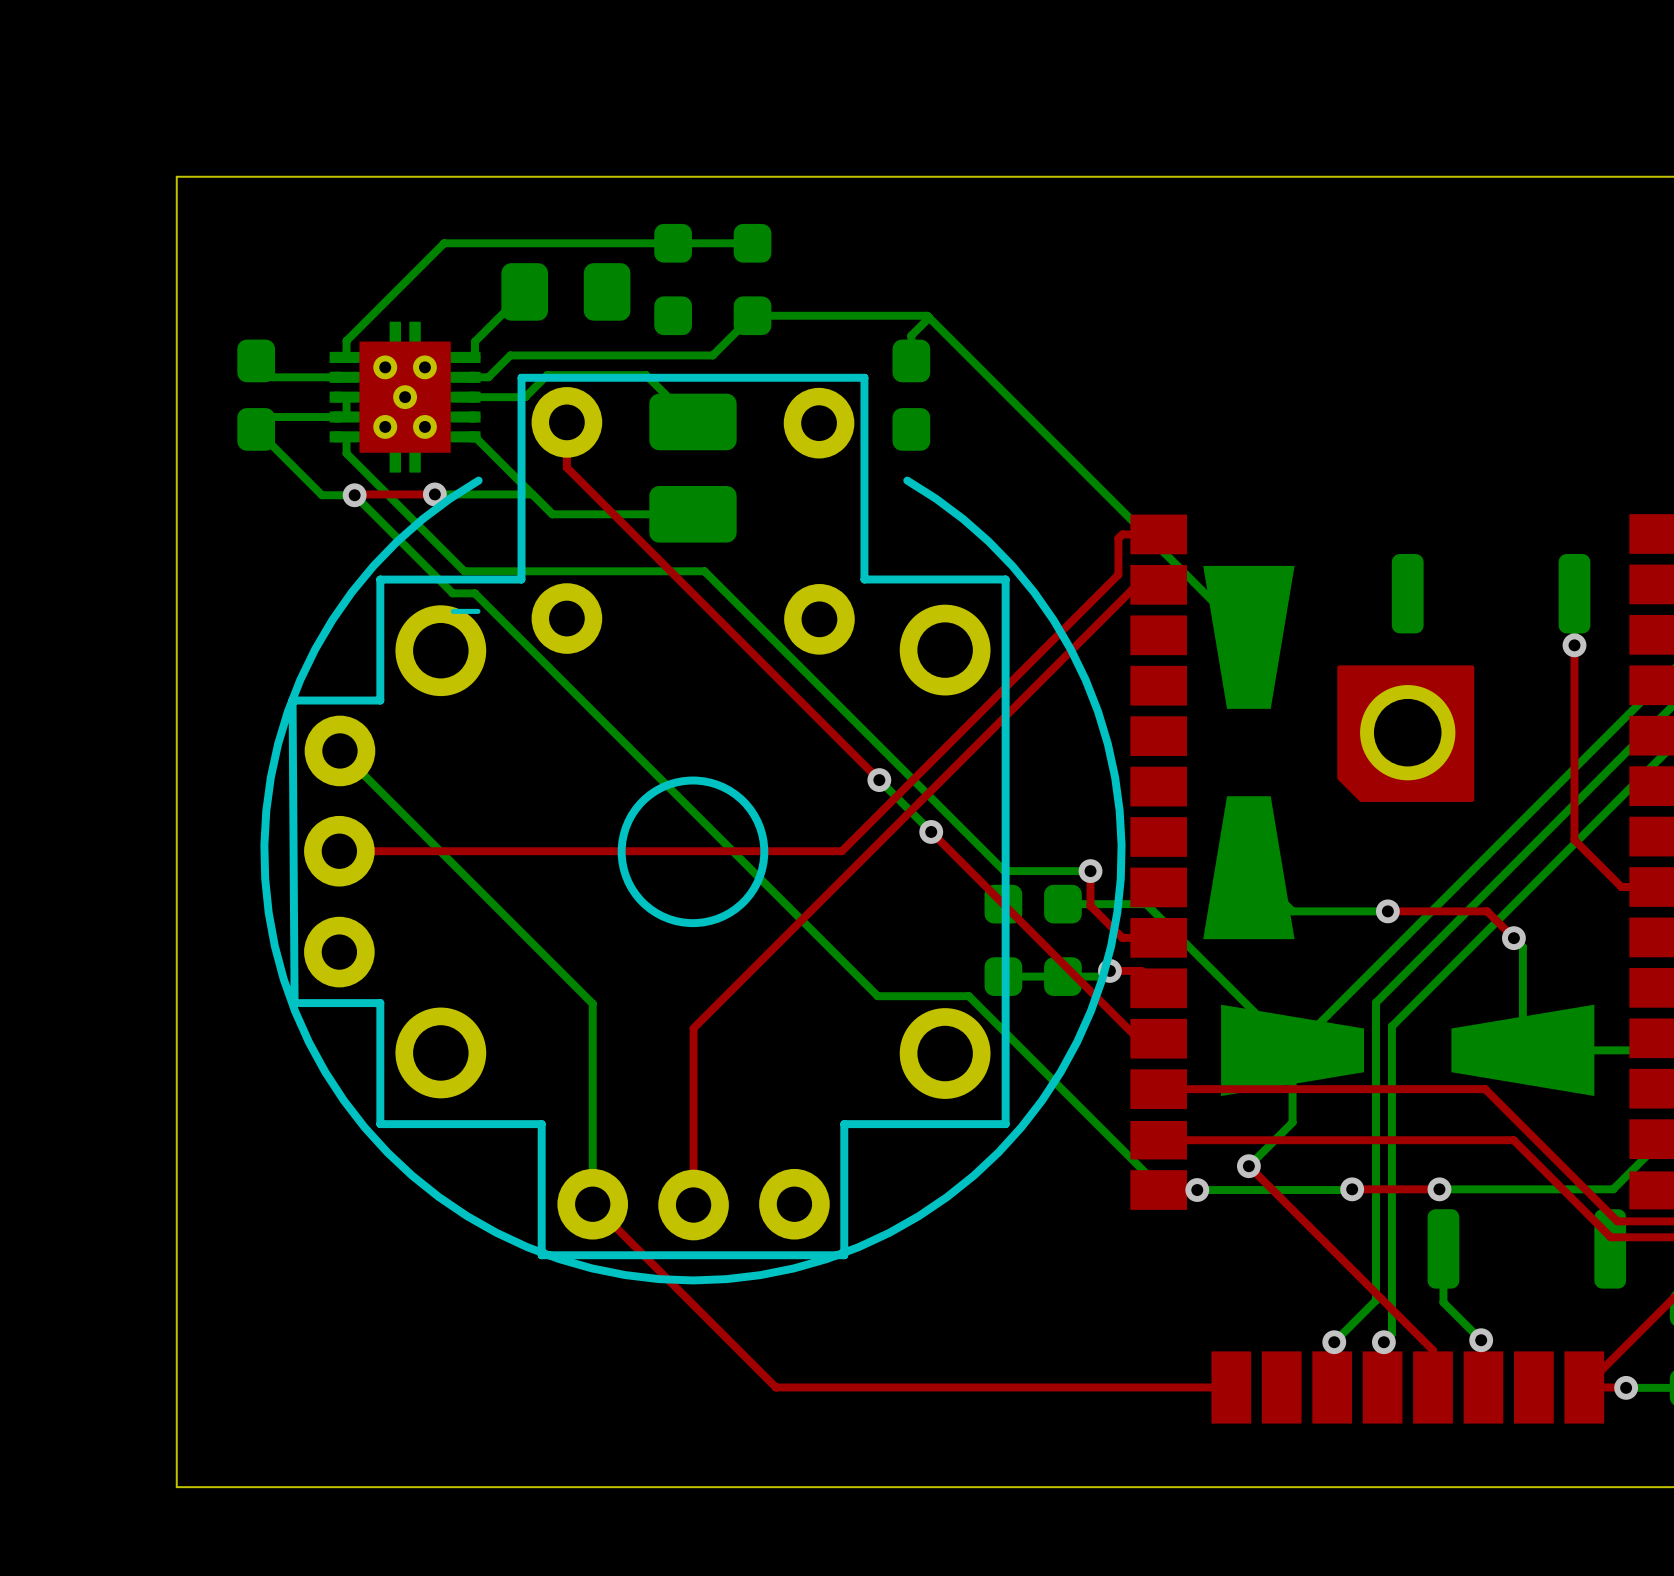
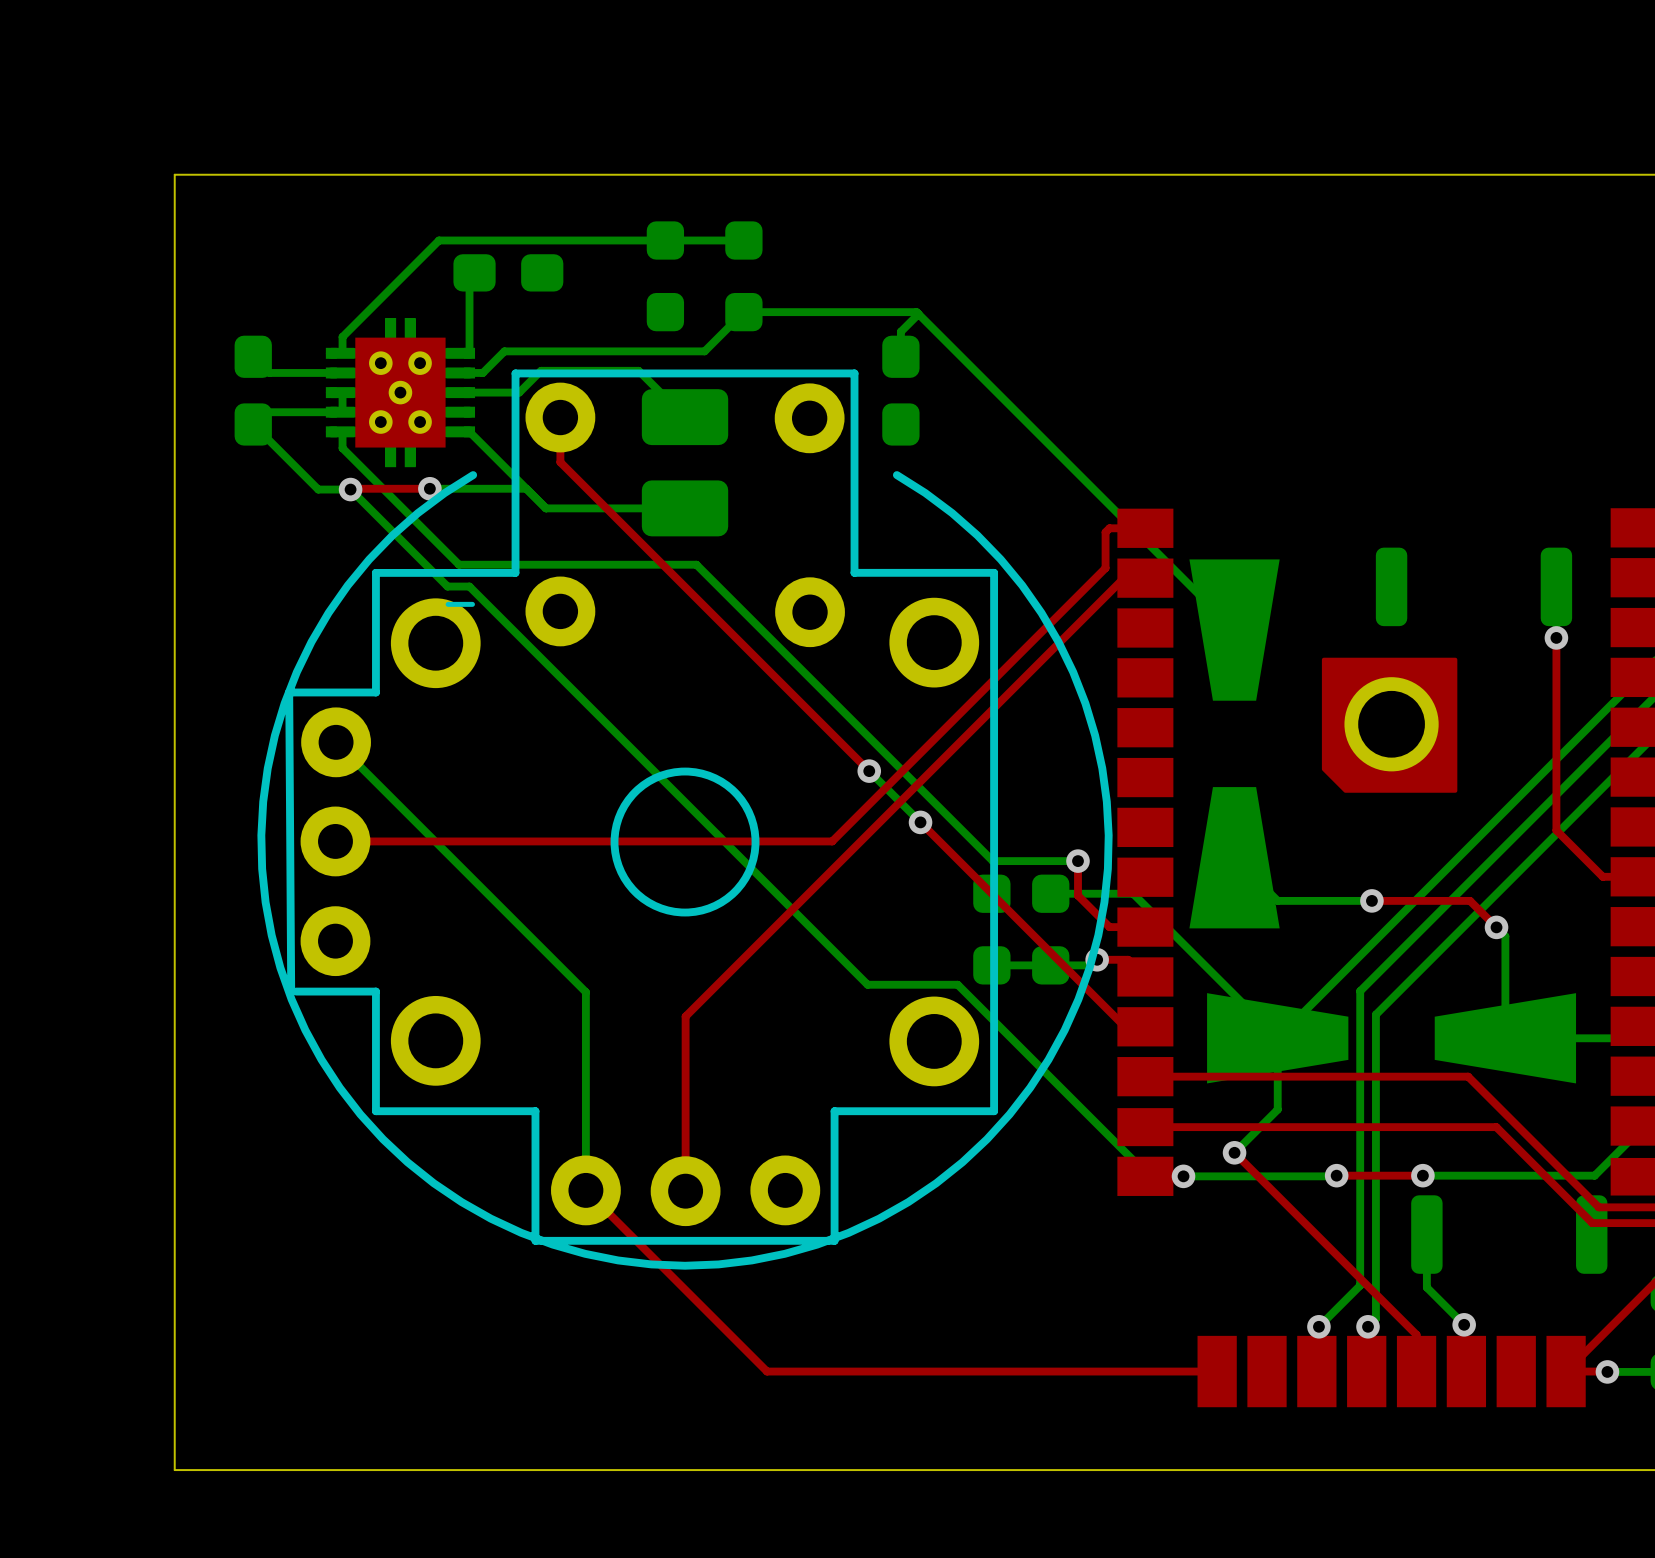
part: none -> (508, 272)
bottom track: (524, 291) (474, 341) -> (474, 272) (469, 277) (469, 337)
part: (565, 291) -> none

